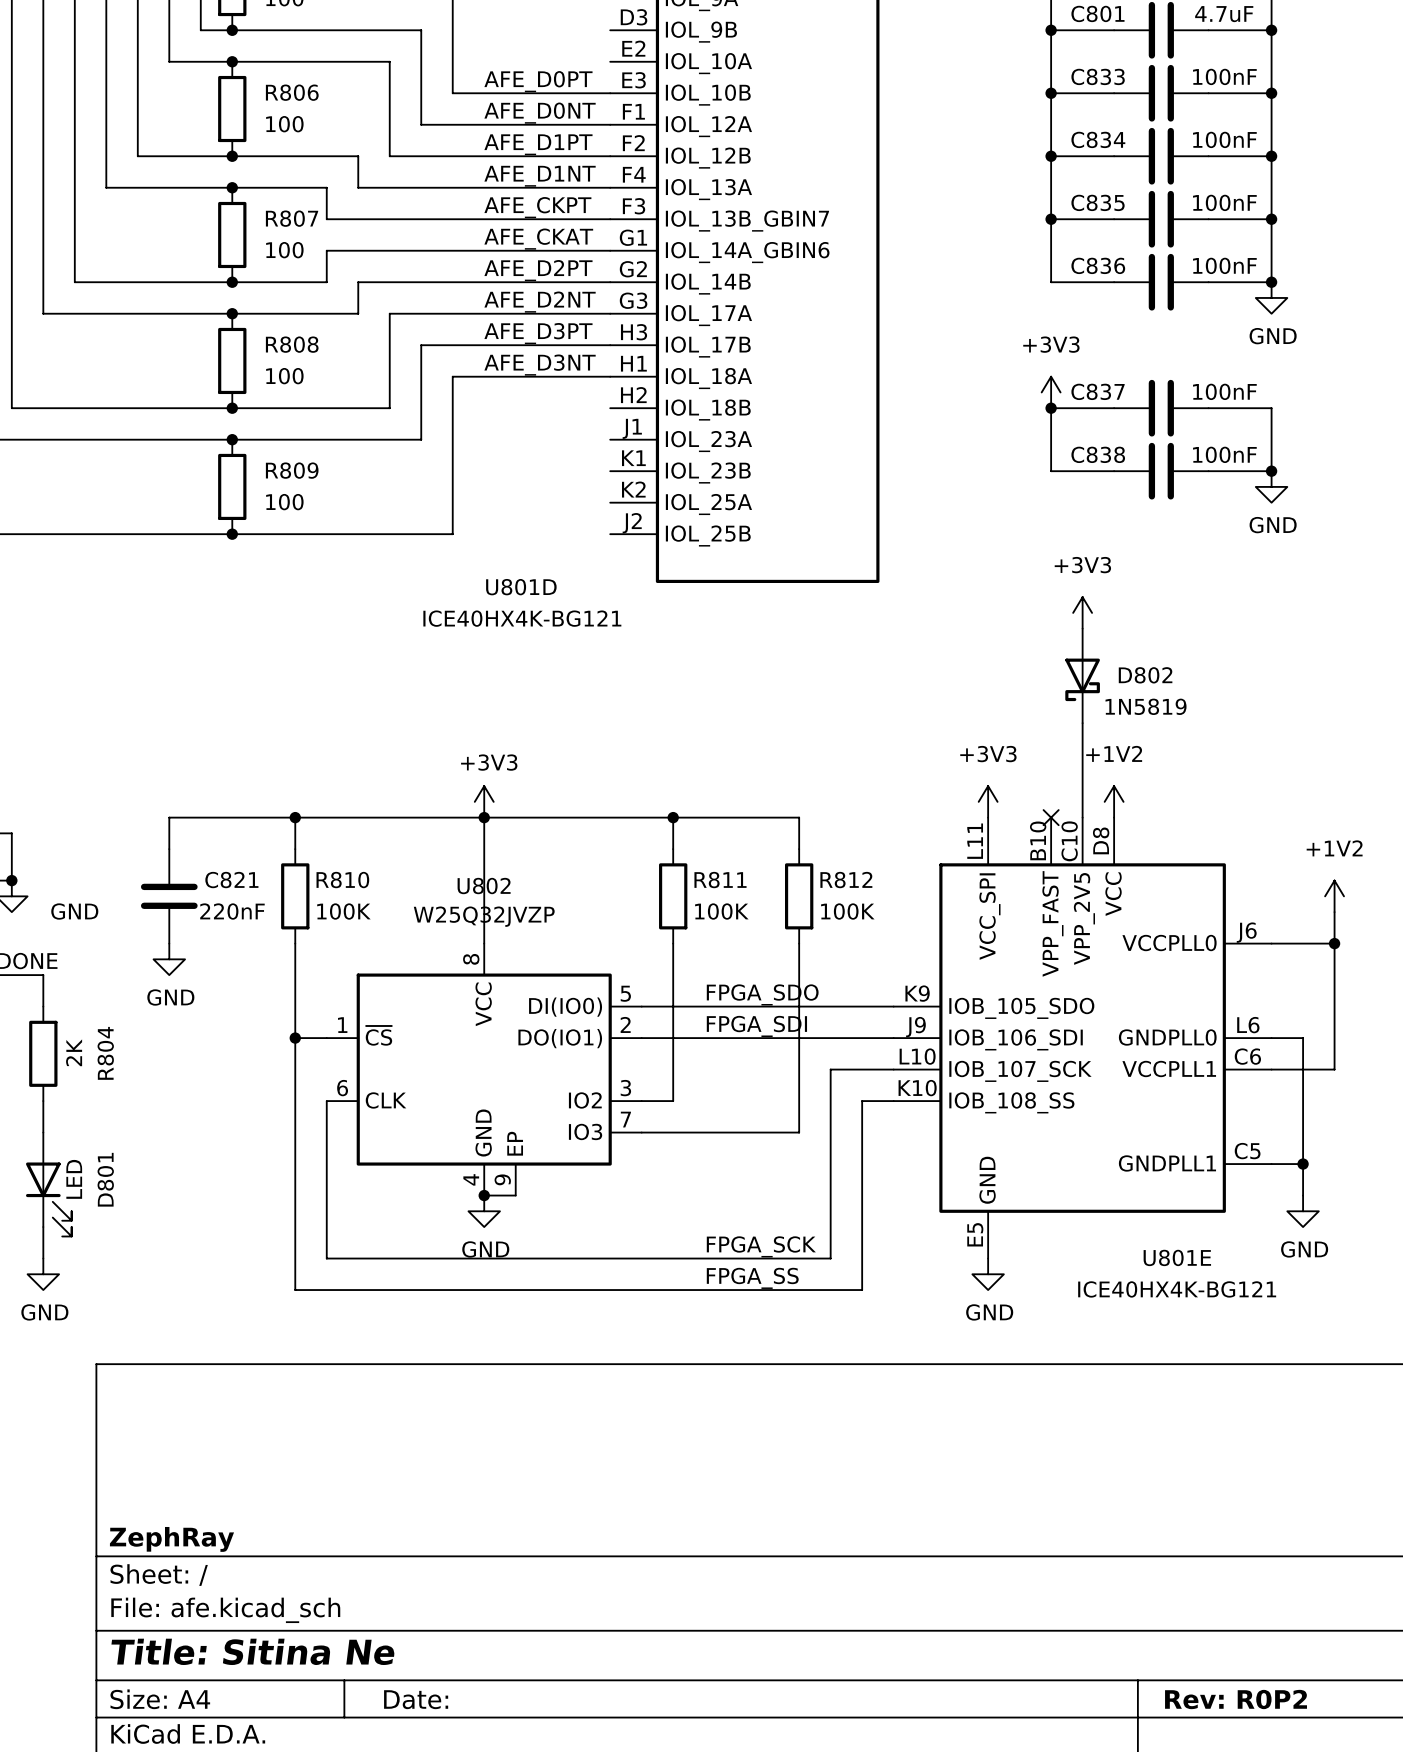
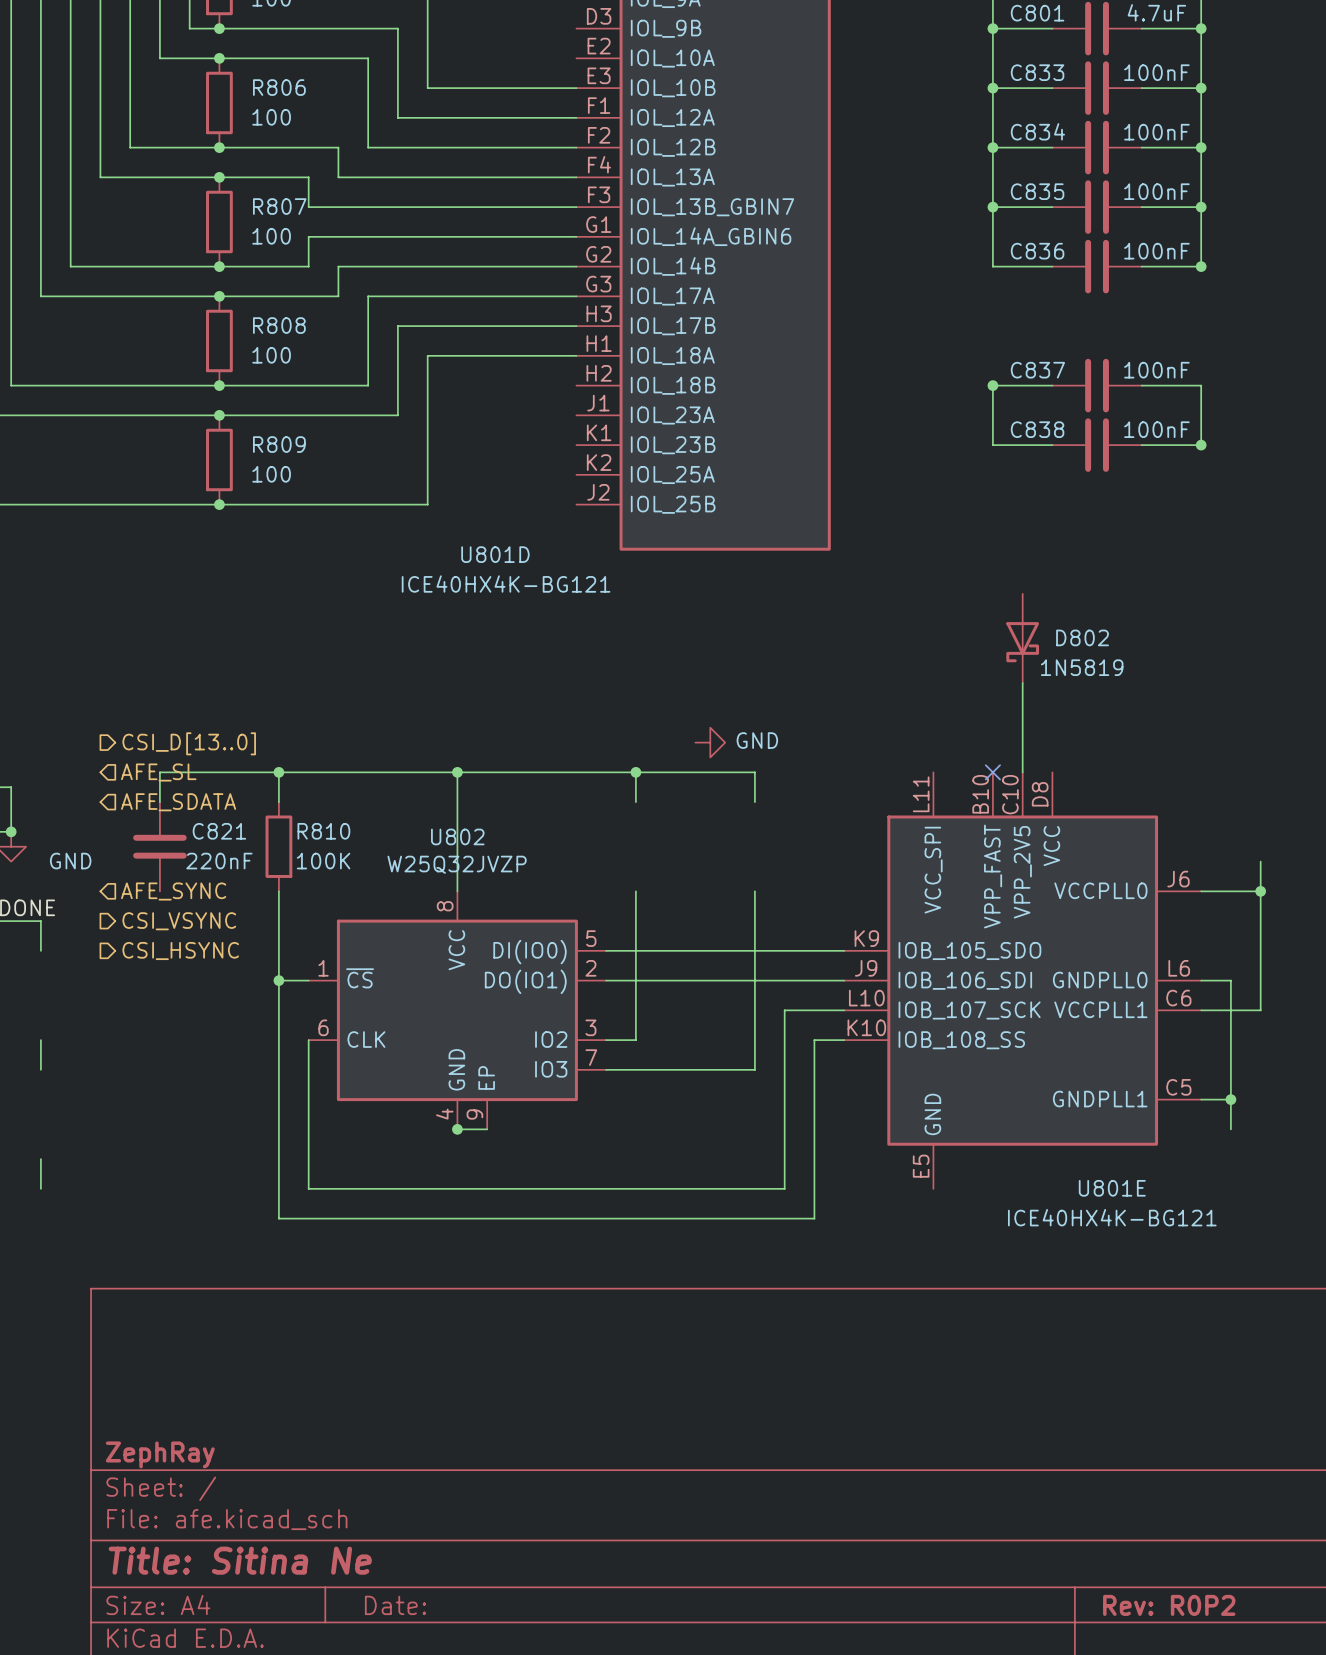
label: AFE_D0PT (538, 81) -> none
label: AFE_D0NT (540, 113) -> none
label: AFE_D1PT (538, 144) -> none
label: AFE_D1NT (540, 176) -> none
label: AFE_CKPT (537, 207) -> none
label: AFE_CKAT (538, 239) -> none
label: AFE_D2PT (538, 270) -> none
power symbol: GND (1271, 297) -> none
label: AFE_D2NT (540, 302) -> none
label: AFE_D3PT (538, 333) -> none
label: AFE_D3NT (540, 365) -> none
power symbol: +3V3 (1051, 392) -> none
power symbol: GND (1271, 486) -> none
power symbol: +3V3 (1082, 612) -> none
power symbol: none -> GND (710, 742)
hierarchical label: none -> CSI_D[13..0] (189, 743)
power symbol: +3V3 (484, 801) -> none
power symbol: +3V3 (988, 801) -> none
power symbol: +1V2 (1114, 801) -> none
hierarchical label: none -> AFE_SL (158, 772)
hierarchical label: none -> AFE_SDATA (178, 802)
R811: 100K (673, 896) -> none
R812: 100K (799, 896) -> none
power symbol: +1V2 (1334, 896) -> none
hierarchical label: none -> AFE_SYNC (173, 891)
power symbol: GND (169, 959) -> none
hierarchical label: none -> CSI_VSYNC (179, 921)
label: FPGA_SDO (762, 994) -> none
hierarchical label: none -> CSI_HSYNC (180, 951)
label: FPGA_SDI (756, 1026) -> none
R804: 2K (43, 1053) -> none
D801: LED (48, 1184) -> none
power symbol: GND (484, 1211) -> none
power symbol: GND (1303, 1211) -> none
label: FPGA_SCK (761, 1246) -> none
power symbol: GND (43, 1274) -> none
power symbol: GND (988, 1274) -> none
label: FPGA_SS (752, 1278) -> none

